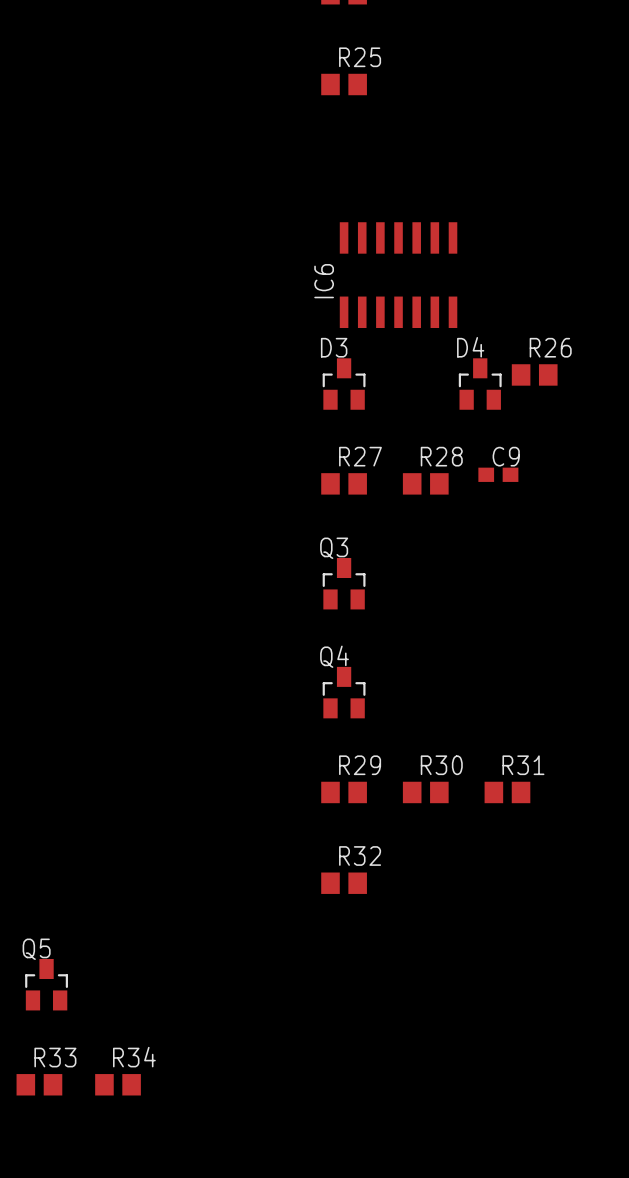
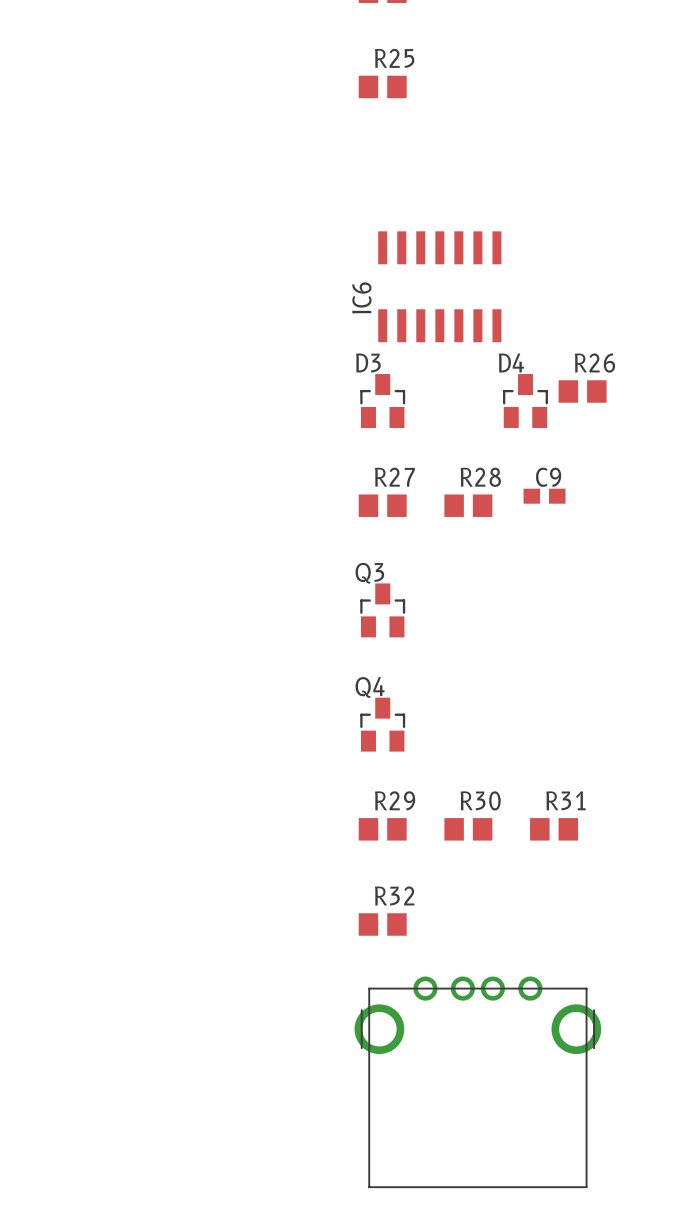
Q5: (46, 984) -> none
part: none -> (477, 1082)
R33: (39, 1084) -> none
R34: (118, 1084) -> none

